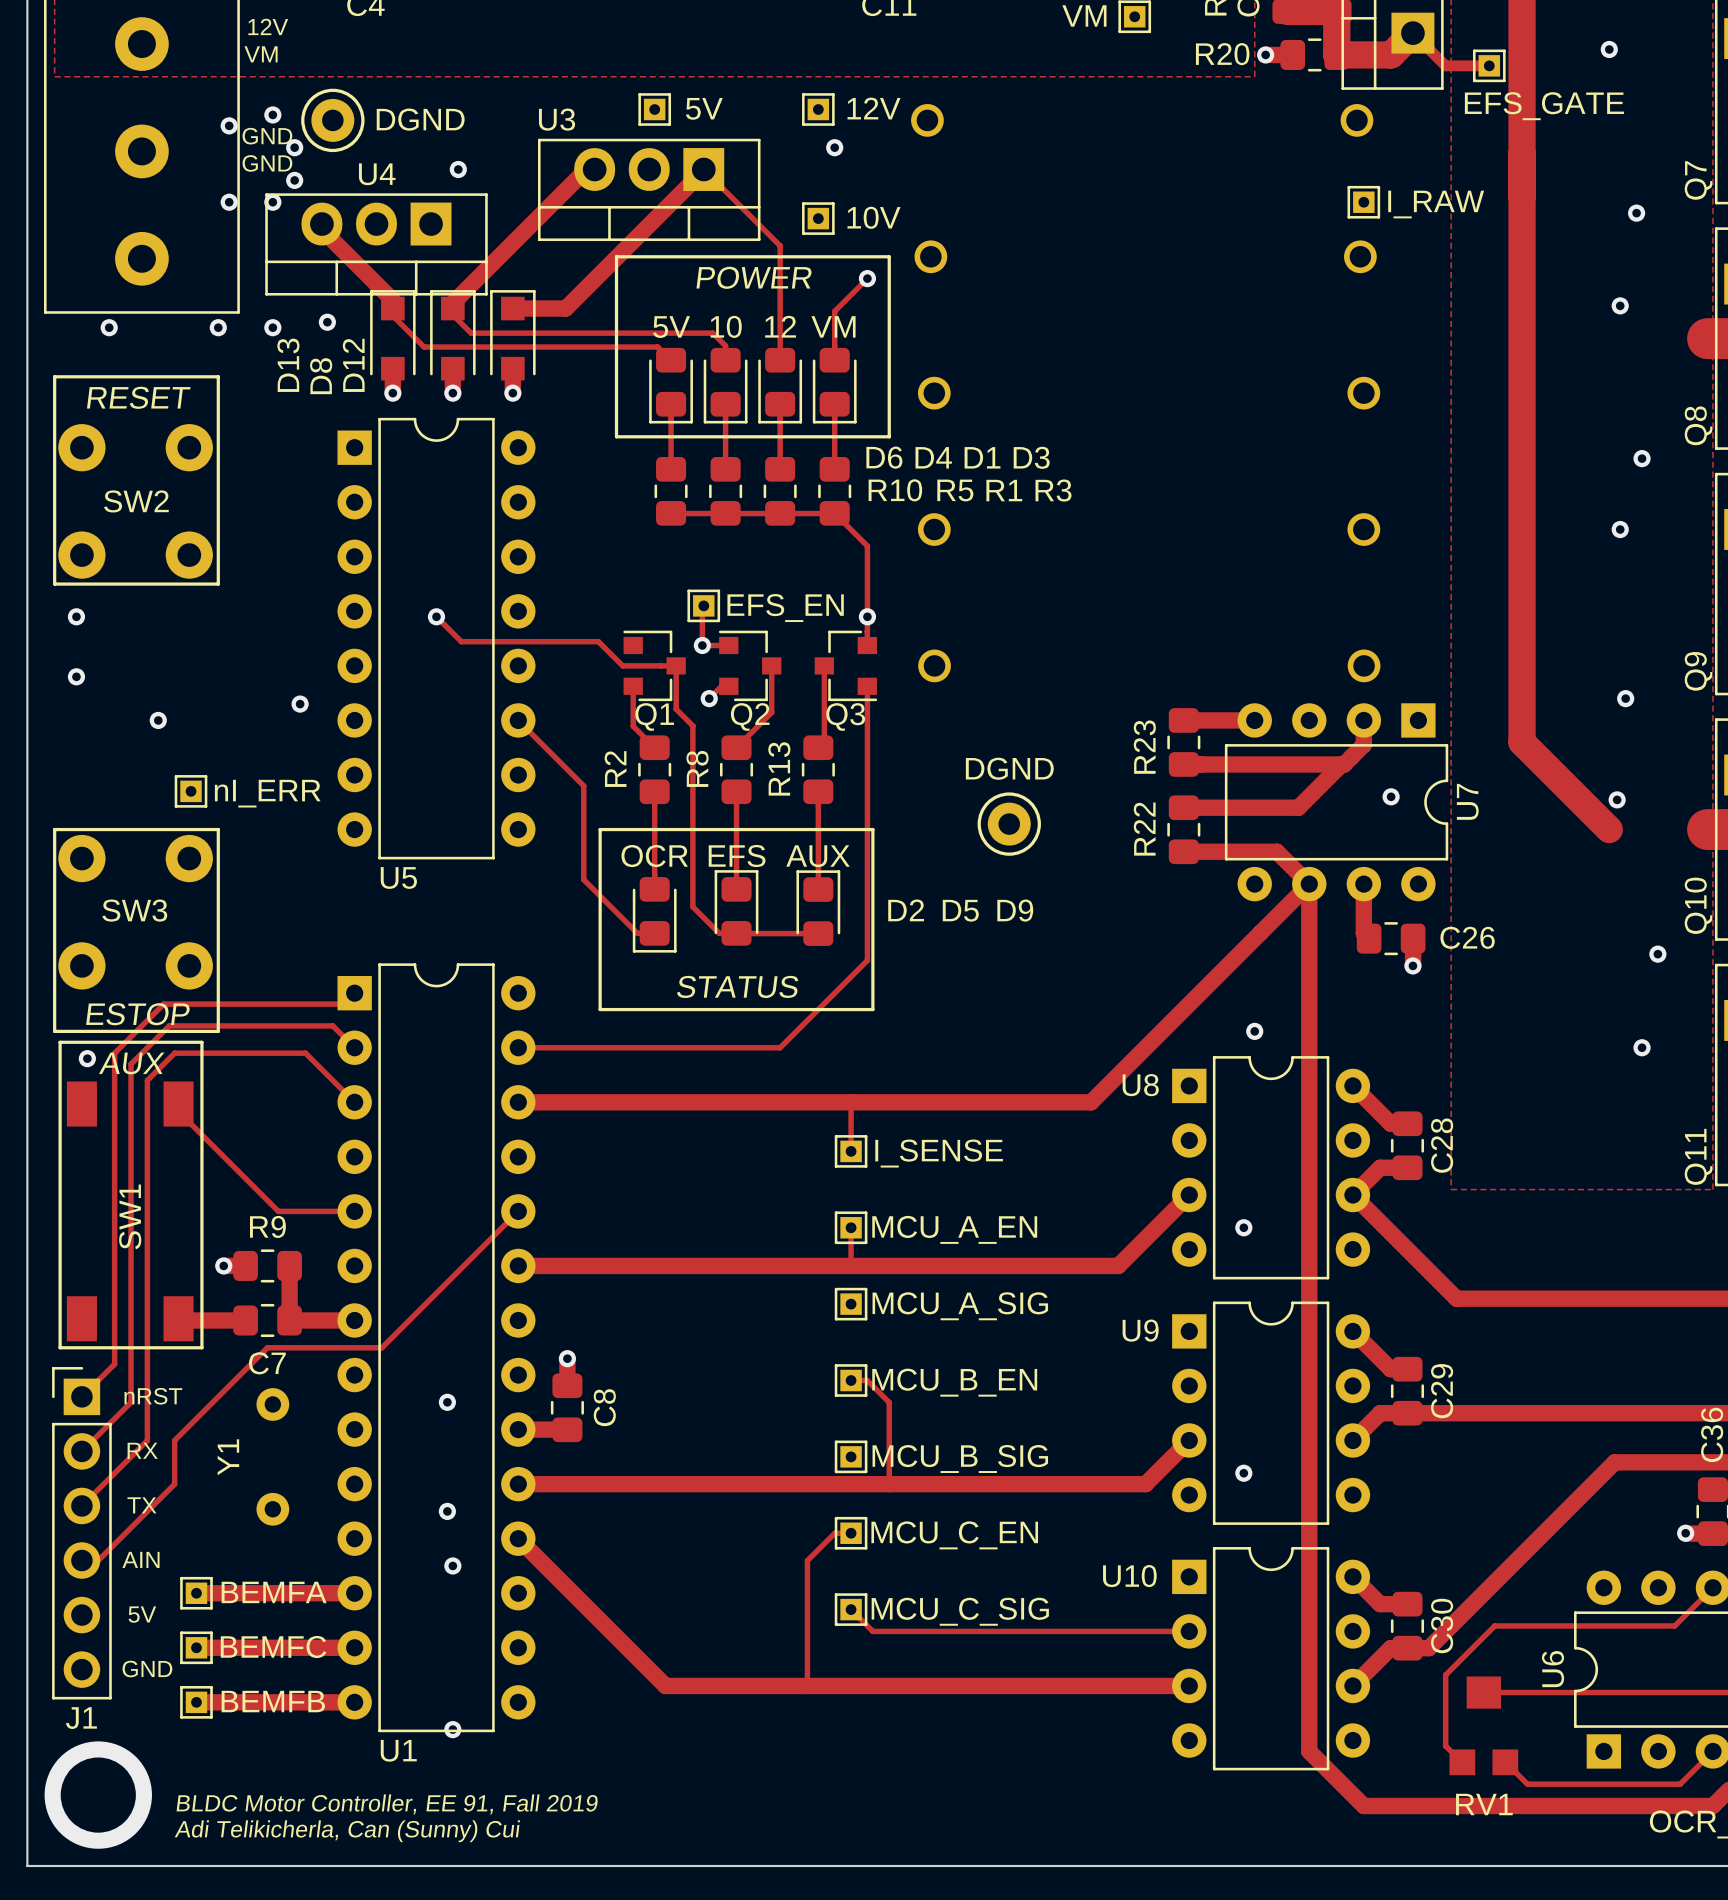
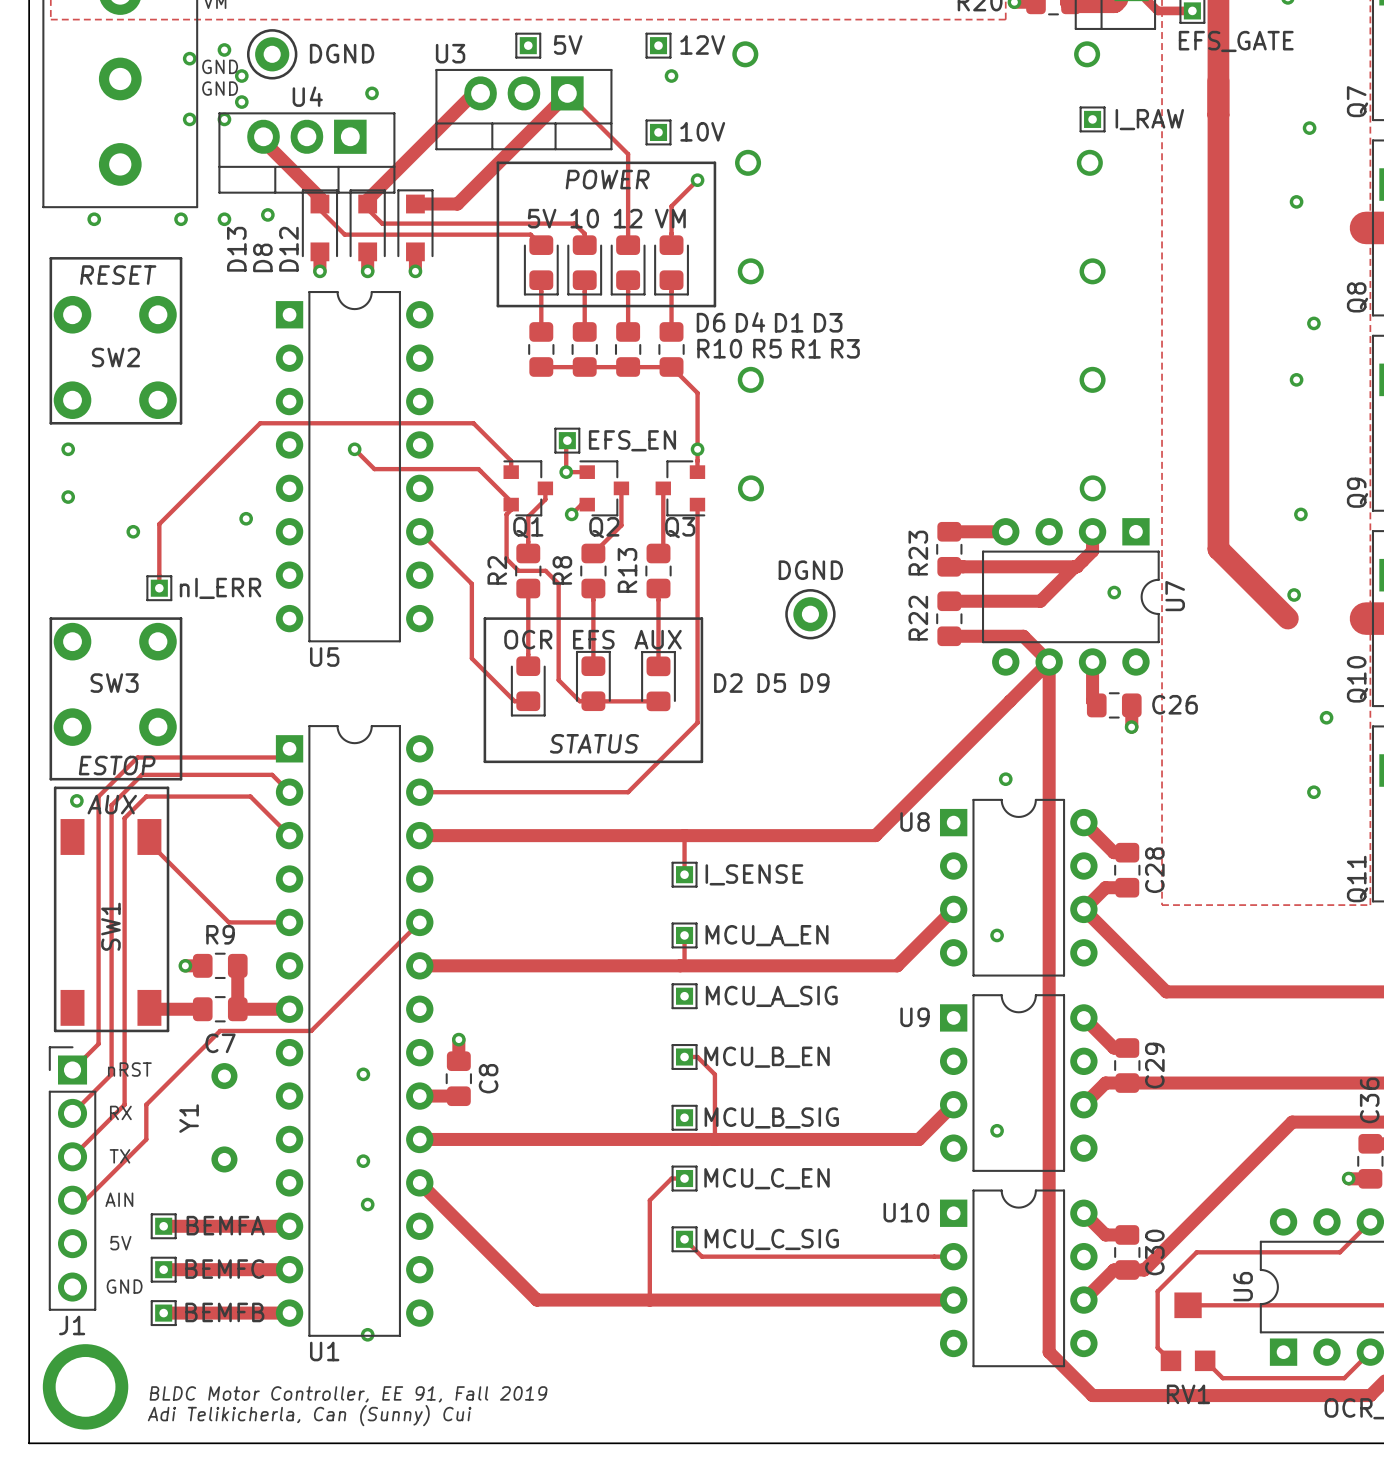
track: (592, 641) (598, 641) (622, 665) (676, 665) -> (478, 469) (511, 501) (511, 504)
track: none -> (511, 472) (511, 460) (473, 423) (260, 423) (159, 524) (159, 588)
track: (676, 679) (676, 709) (692, 725) (692, 785) -> (511, 509) (506, 514) (506, 558) (518, 570) (545, 570) (558, 583)
track: (633, 692) (633, 726) (654, 747) -> (545, 499) (528, 516) (528, 553)

